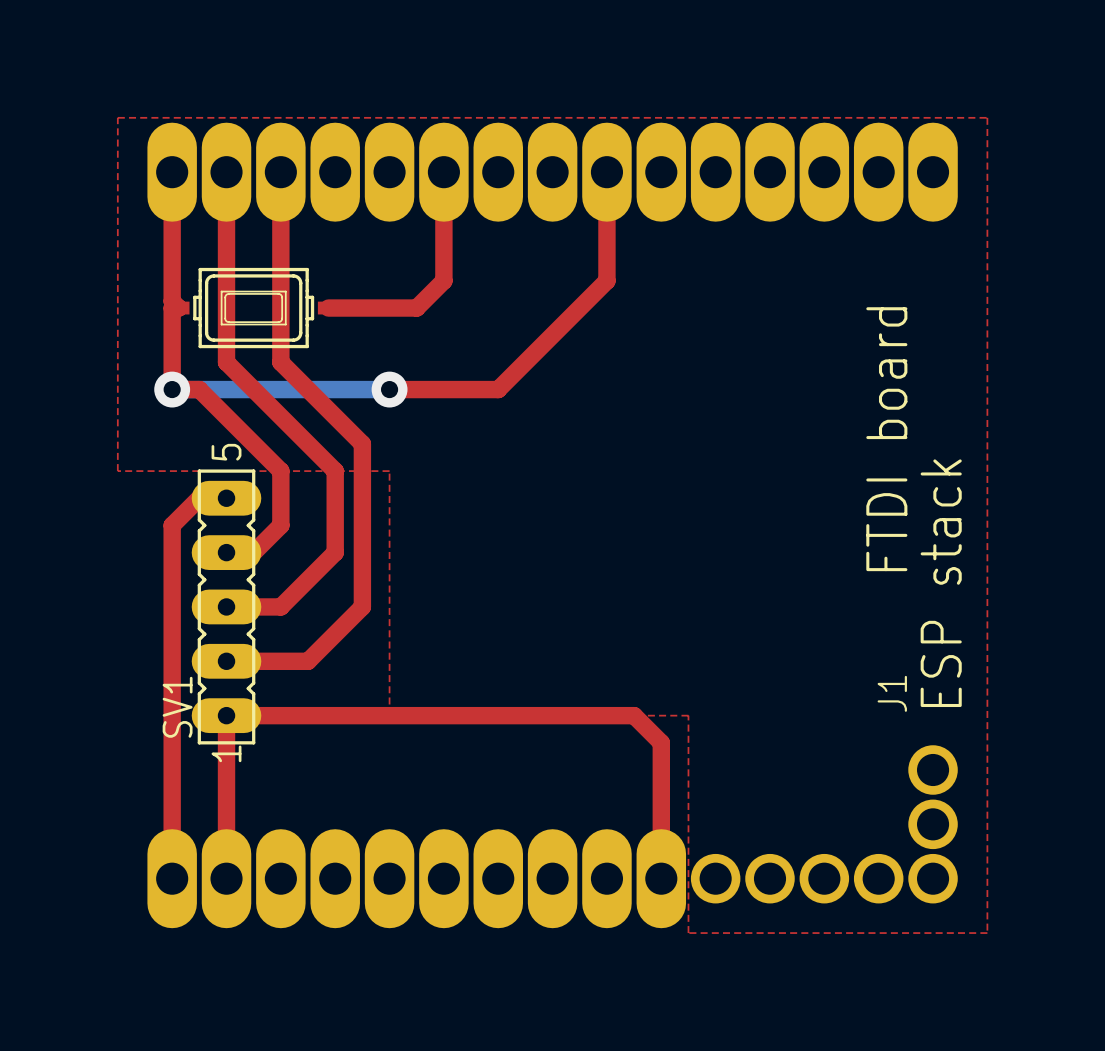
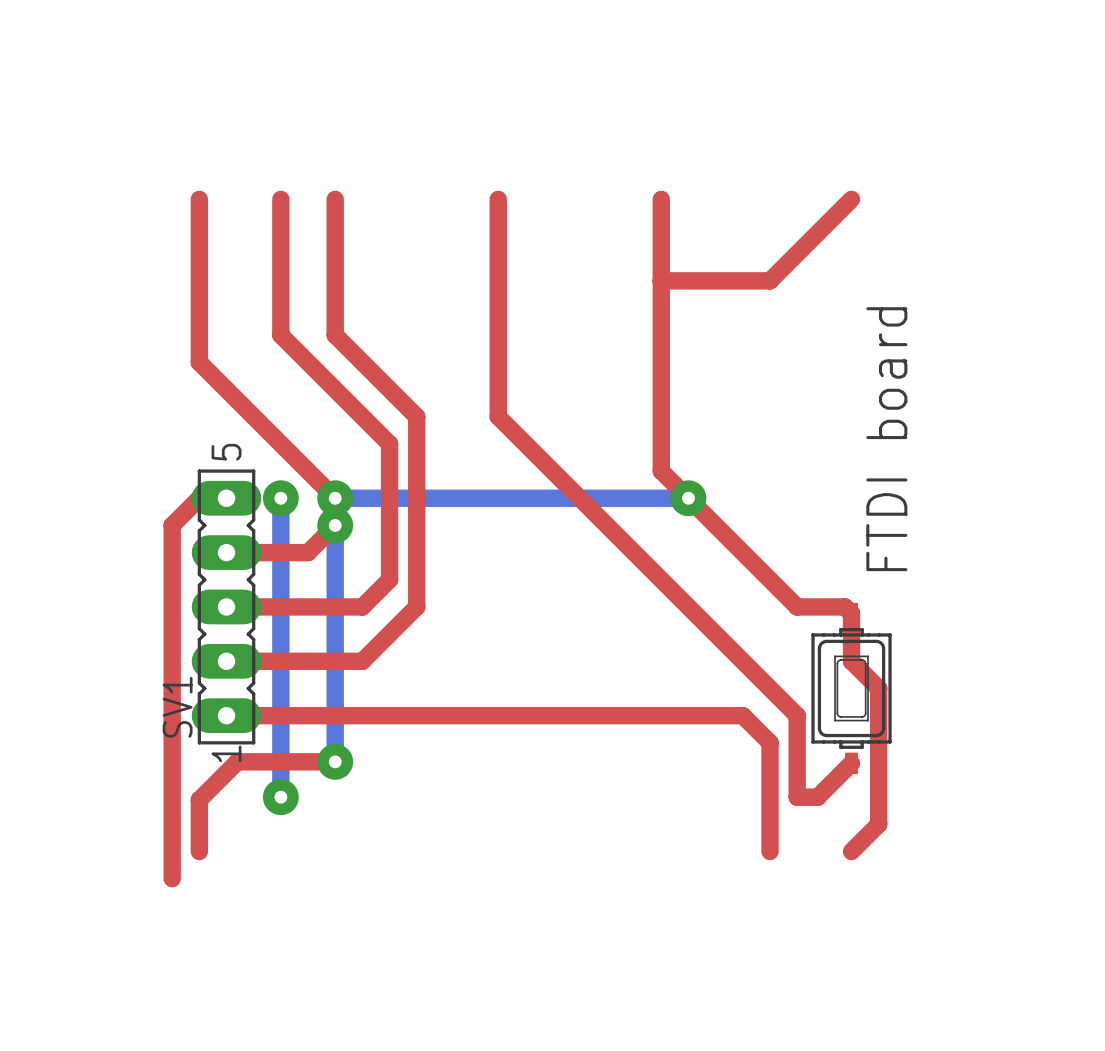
top zone outline: (117, 117) (987, 117) (987, 933) (688, 933) (688, 715) (389, 715) (389, 471) (117, 471) (117, 117) -> none
top track: (172, 172) (172, 301) (178, 308) (172, 308) (172, 389) (199, 389) (280, 471) (280, 525) (253, 552) -> none
top track: (226, 172) (226, 362) (335, 471) (335, 498) -> (199, 199) (199, 362) (335, 498)
top track: (443, 172) (443, 280) (416, 308) (328, 308) -> none
top track: (606, 172) (606, 280) (498, 389) (389, 389) -> none
top track: none -> (335, 199) (335, 335) (416, 416) (416, 606) (362, 661) (308, 661)
top track: none -> (498, 199) (498, 416) (797, 715) (797, 797) (817, 797) (851, 763)
top track: none -> (661, 199) (661, 471) (797, 606) (844, 606) (851, 613) (851, 661) (878, 688) (878, 824) (851, 851)
top track: none -> (851, 199) (770, 280) (661, 280)
part: (253, 308) -> none
top track: (280, 335) (280, 362) (362, 443) (362, 606) (308, 661) -> (280, 335) (389, 443) (389, 579) (362, 606) (280, 606)
bottom track: (172, 389) (389, 389) -> none
via: (172, 389) -> none
via: (389, 389) -> none
bottom track: none -> (280, 498) (280, 797)
via: none -> (280, 498)
bottom track: none -> (335, 498) (688, 498)
via: none -> (335, 498)
via: none -> (688, 498)
top track: (335, 525) (335, 552) (280, 606) -> (335, 525) (308, 552) (253, 552)
bottom track: none -> (335, 525) (335, 761)
via: none -> (335, 525)
J1: (552, 525) -> none
part: none -> (851, 688)
top track: (226, 715) (226, 878) -> none
top track: (634, 715) (661, 742) (661, 878) -> (634, 715) (742, 715) (770, 742) (770, 851)
top track: none -> (335, 761) (237, 761) (199, 799) (199, 851)
via: none -> (335, 761)
via: none -> (280, 797)

